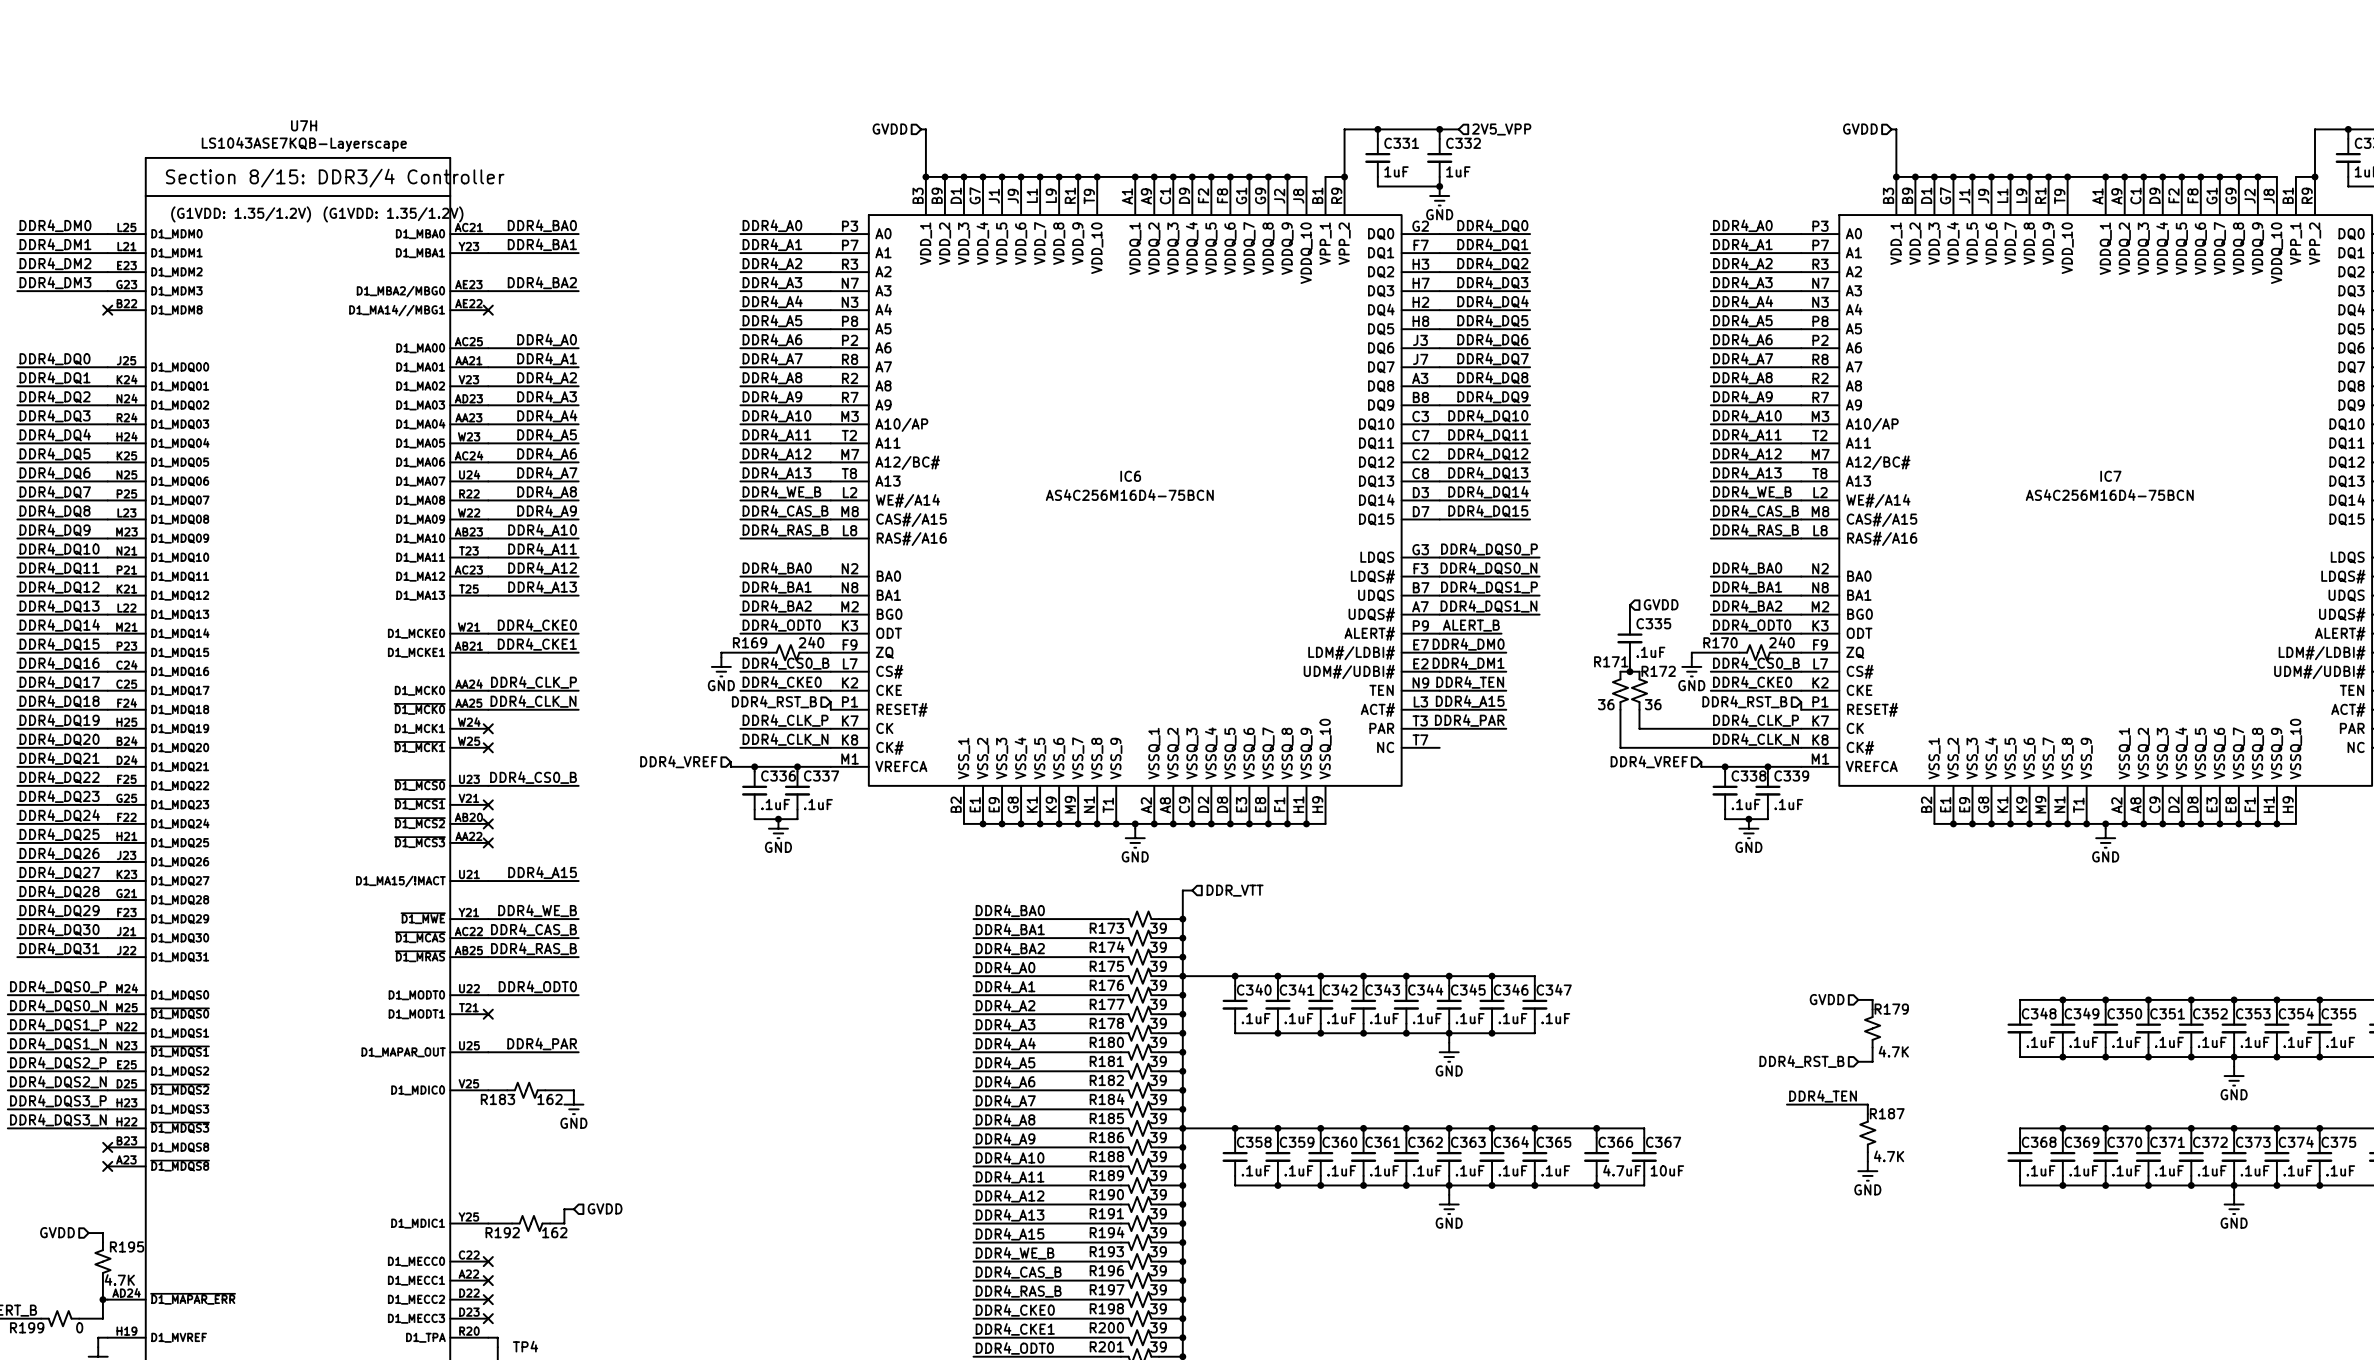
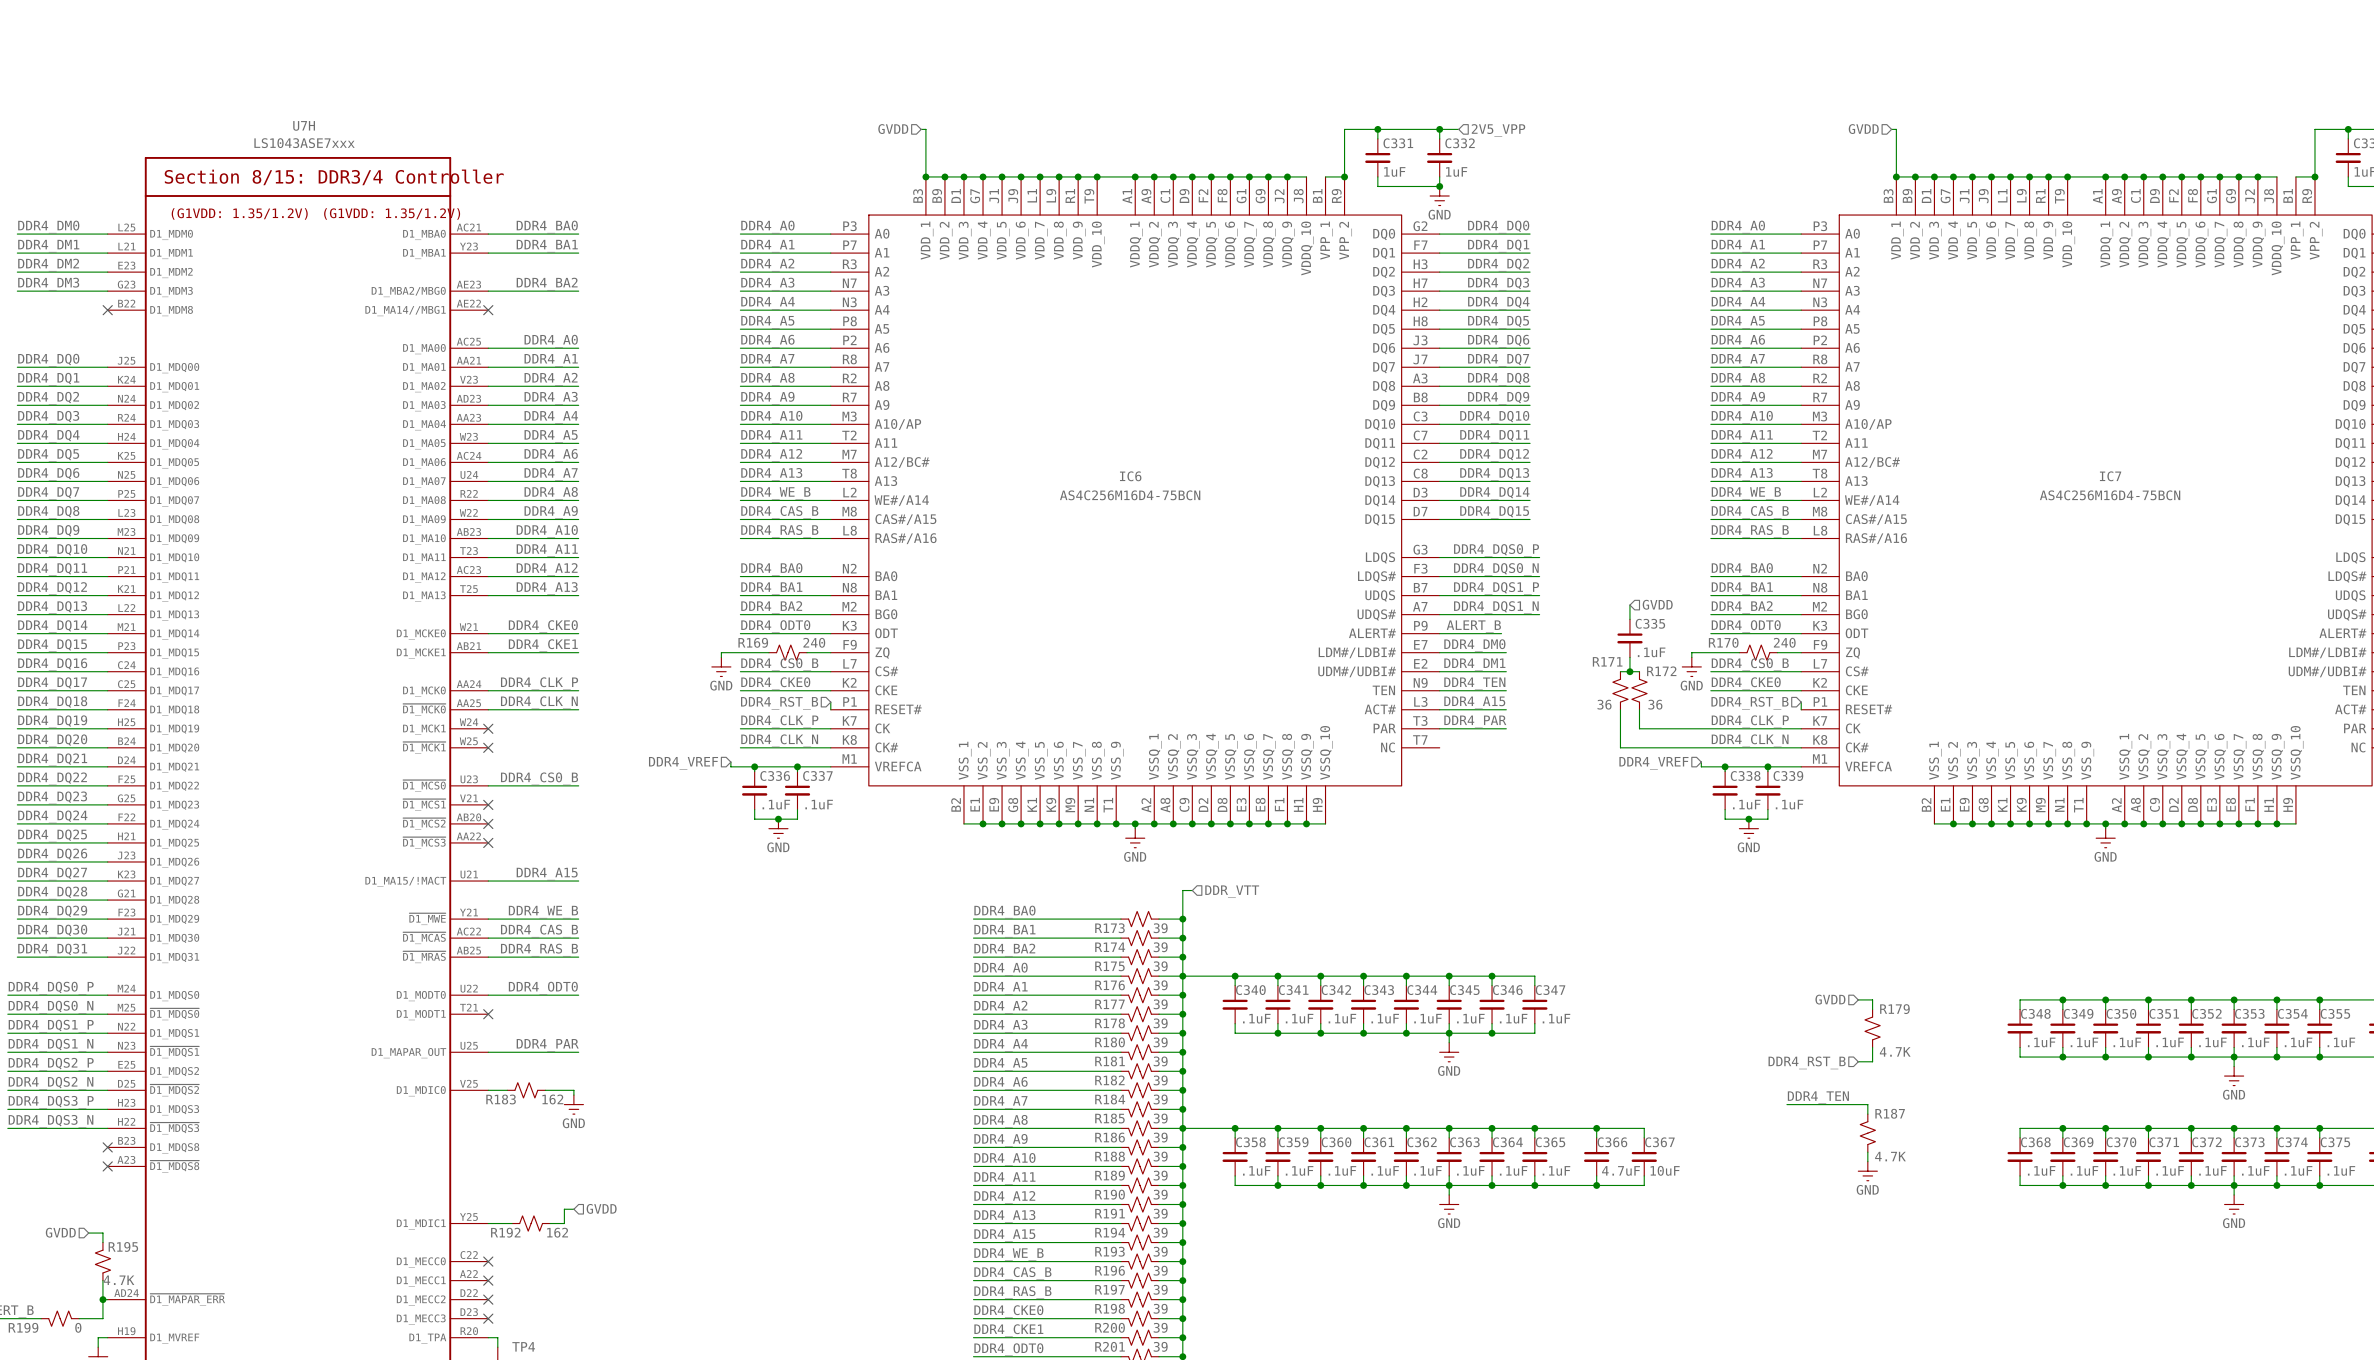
U7H value: LS1043ASE7KQB-Layerscape (304, 144) -> LS1043ASE7xxx (304, 143)

